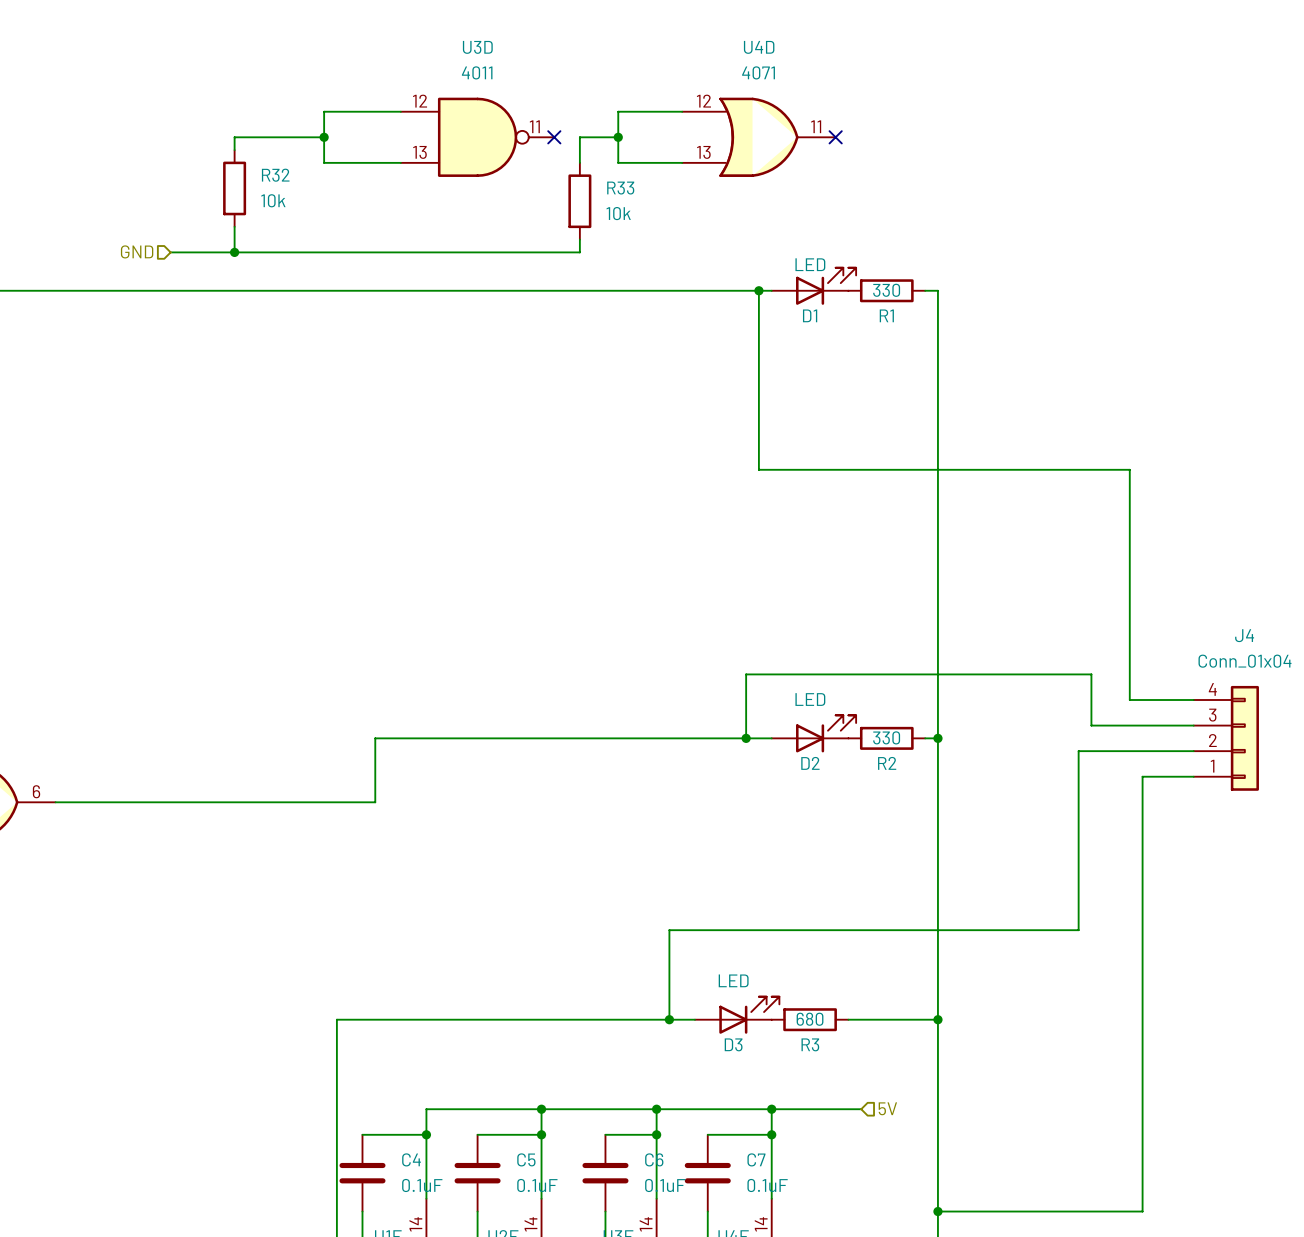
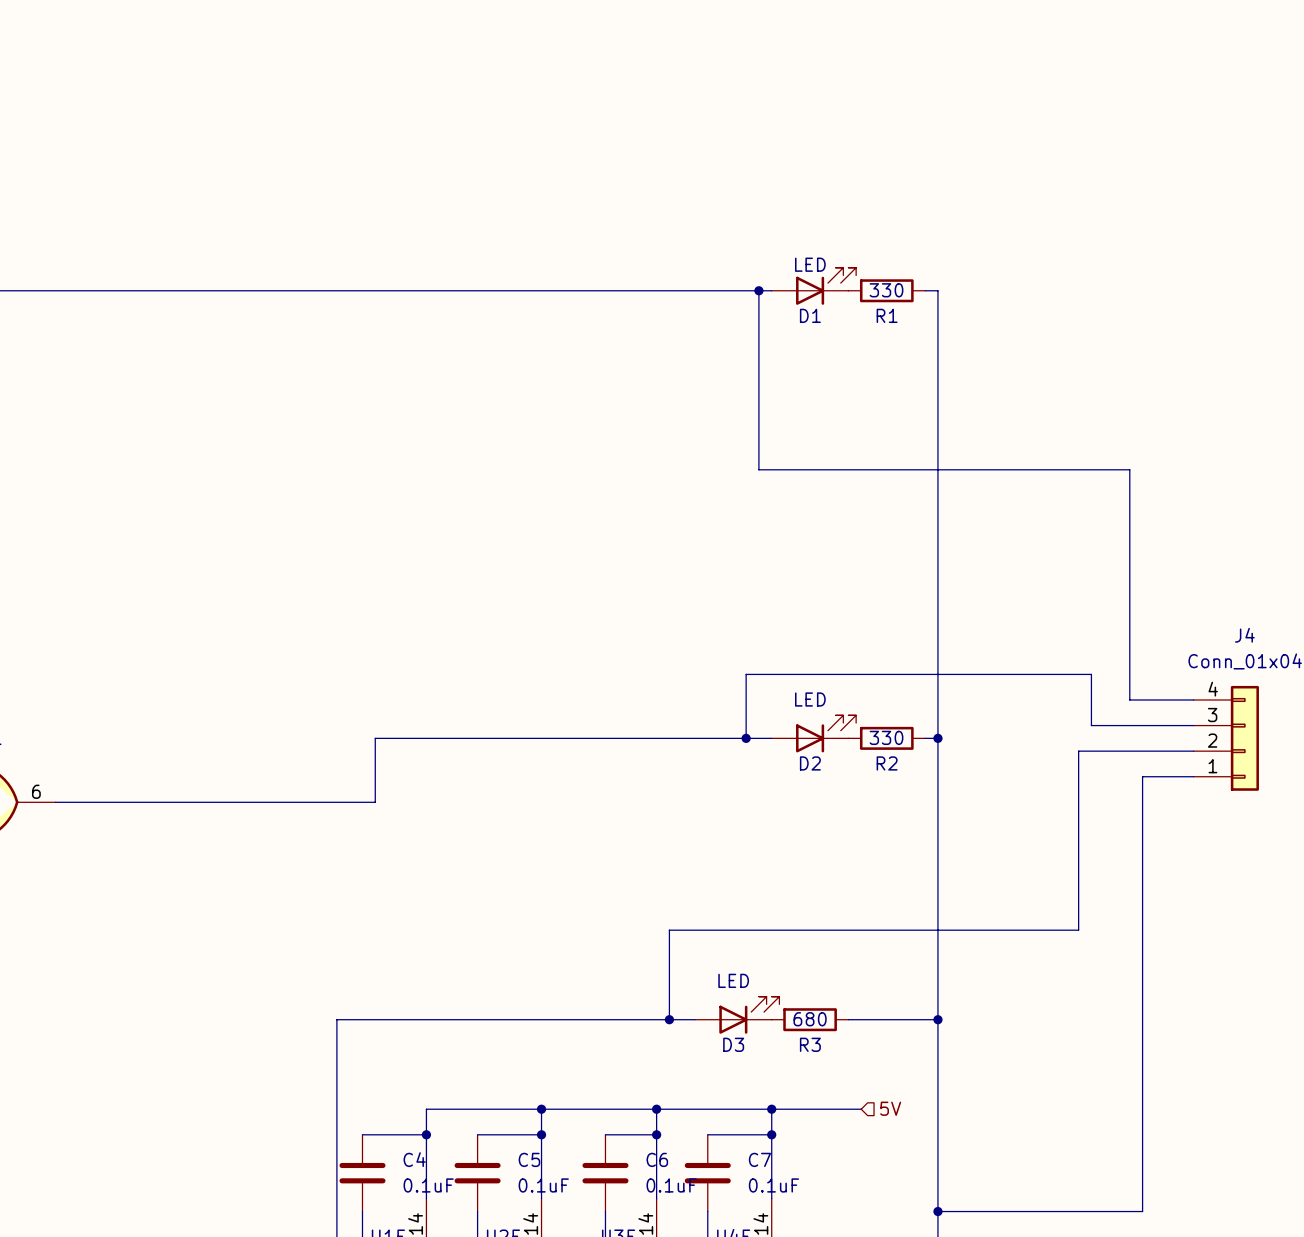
wire: (400, 111) (324, 111) (324, 162) (400, 162) -> none
wire: (682, 111) (618, 111) (618, 162) (682, 162) -> none
wire: (324, 137) (234, 137) (234, 150) -> none
junction: (324, 137) -> none
U3D: 4011 (477, 137) -> none
no-connect mark: (554, 137) -> none
wire: (618, 137) (579, 137) (579, 162) -> none
junction: (618, 137) -> none
U4D: 4071 (758, 137) -> none
no-connect mark: (835, 137) -> none
R32: 10k (234, 188) -> none
R33: 10k (579, 201) -> none
wire: (234, 226) (234, 252) -> none
wire: (579, 239) (579, 252) (170, 252) -> none
hierarchical label: GND (137, 251) -> none
junction: (234, 252) -> none

